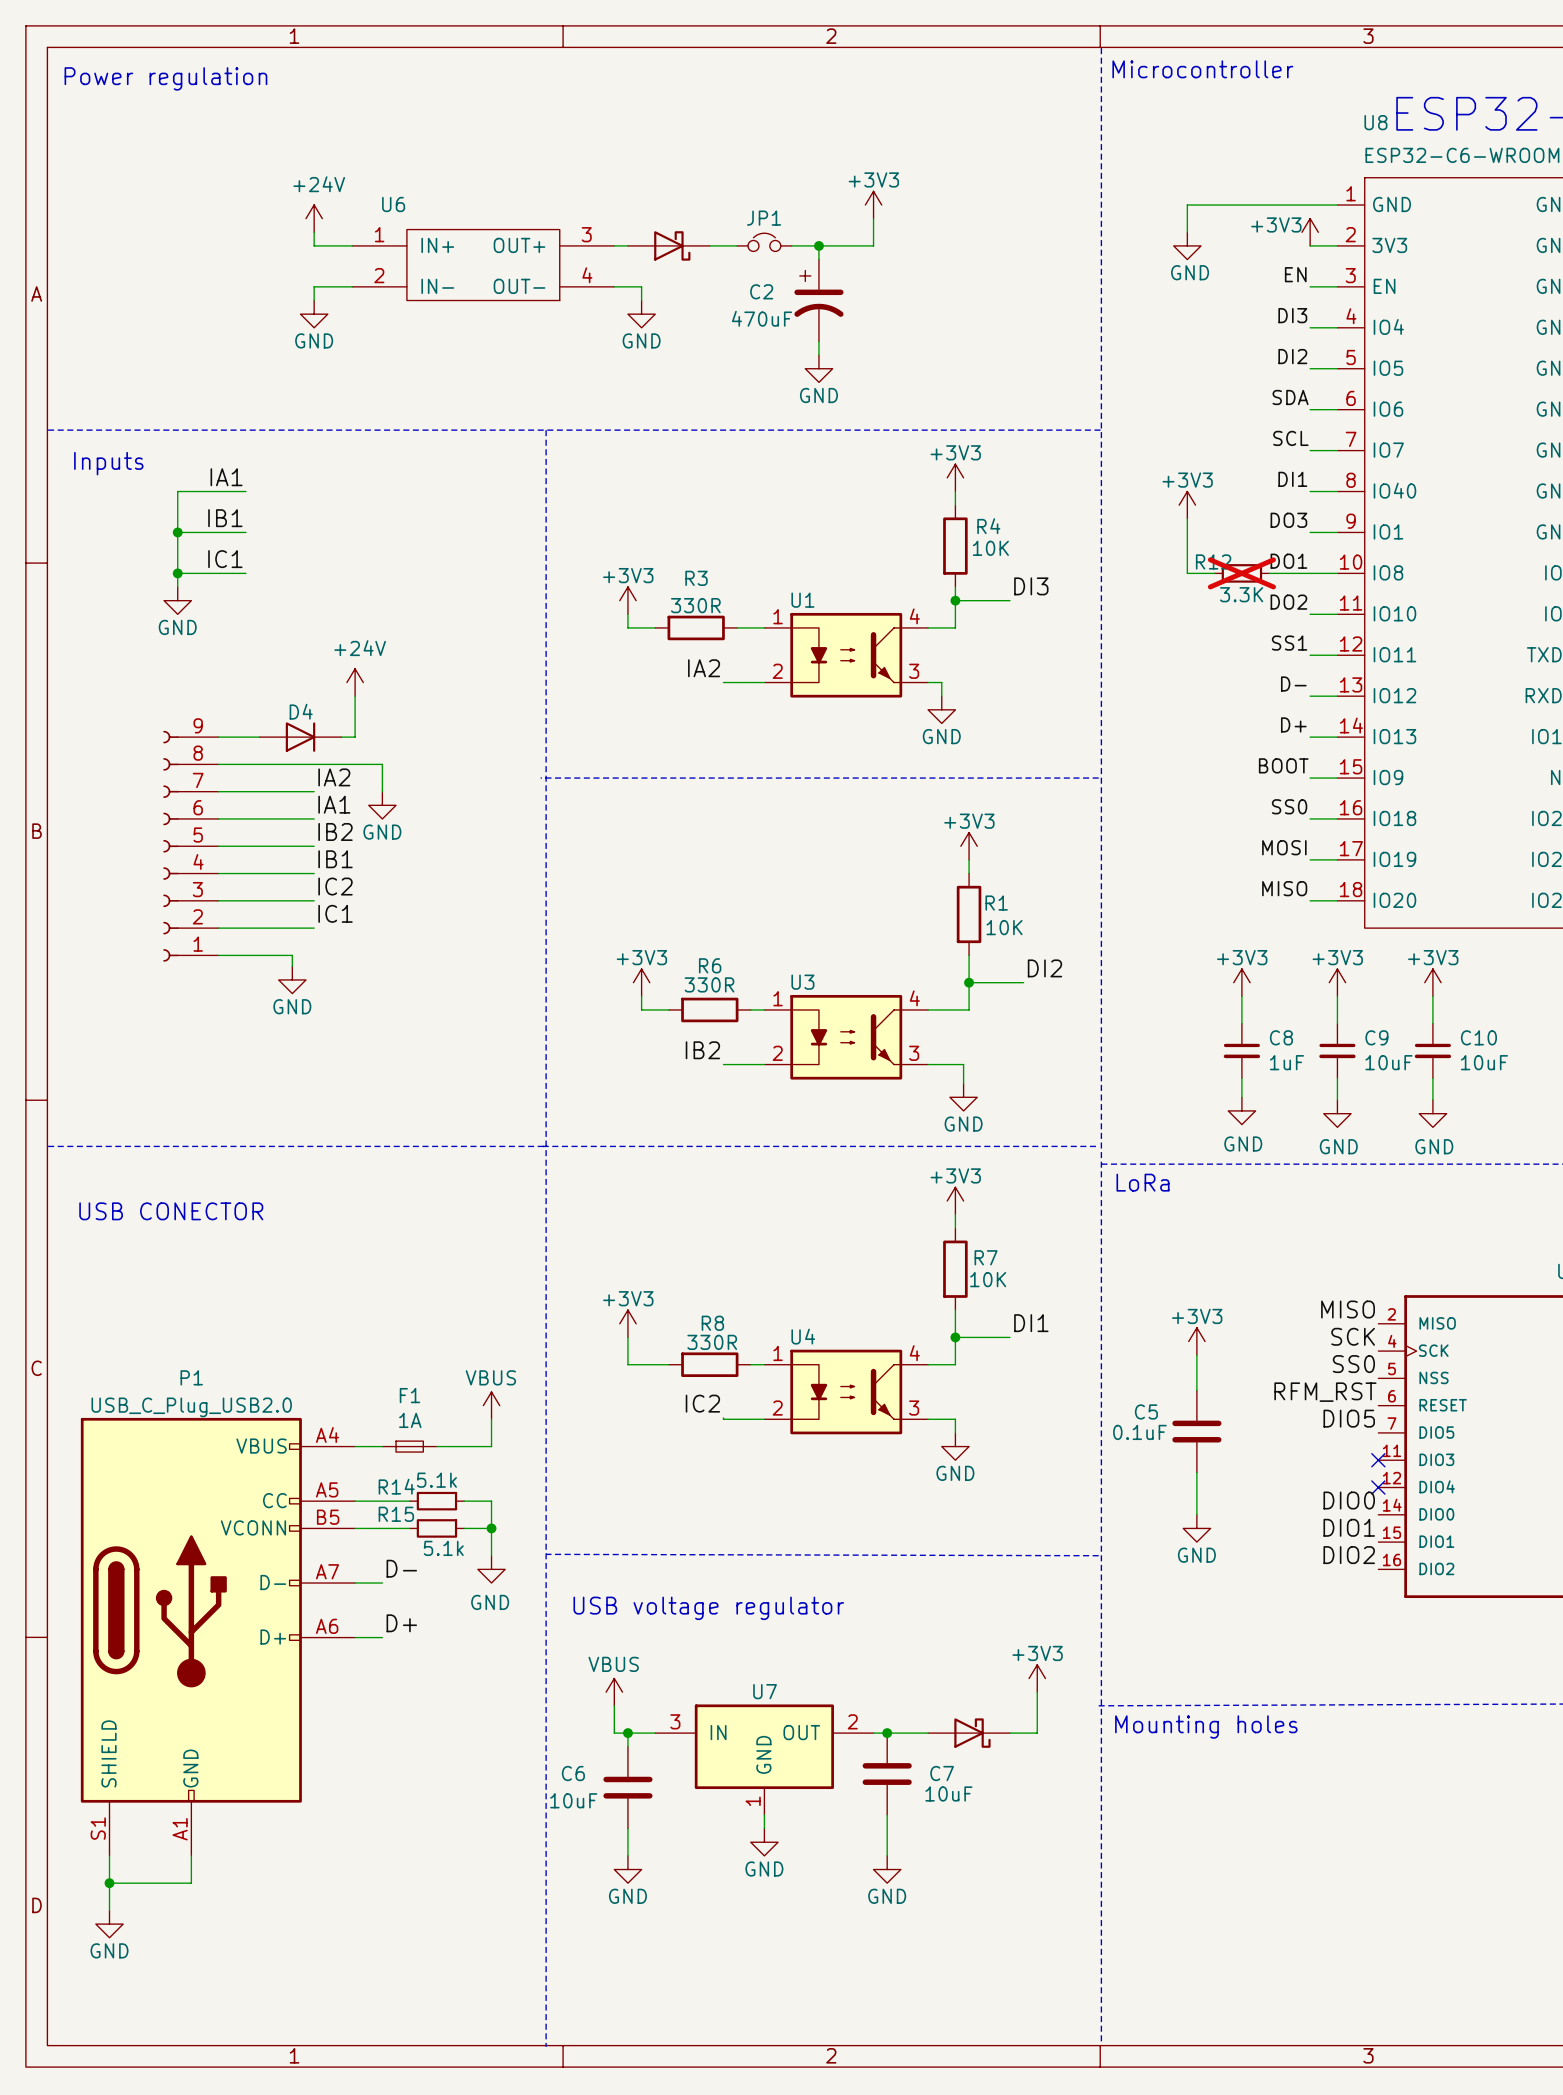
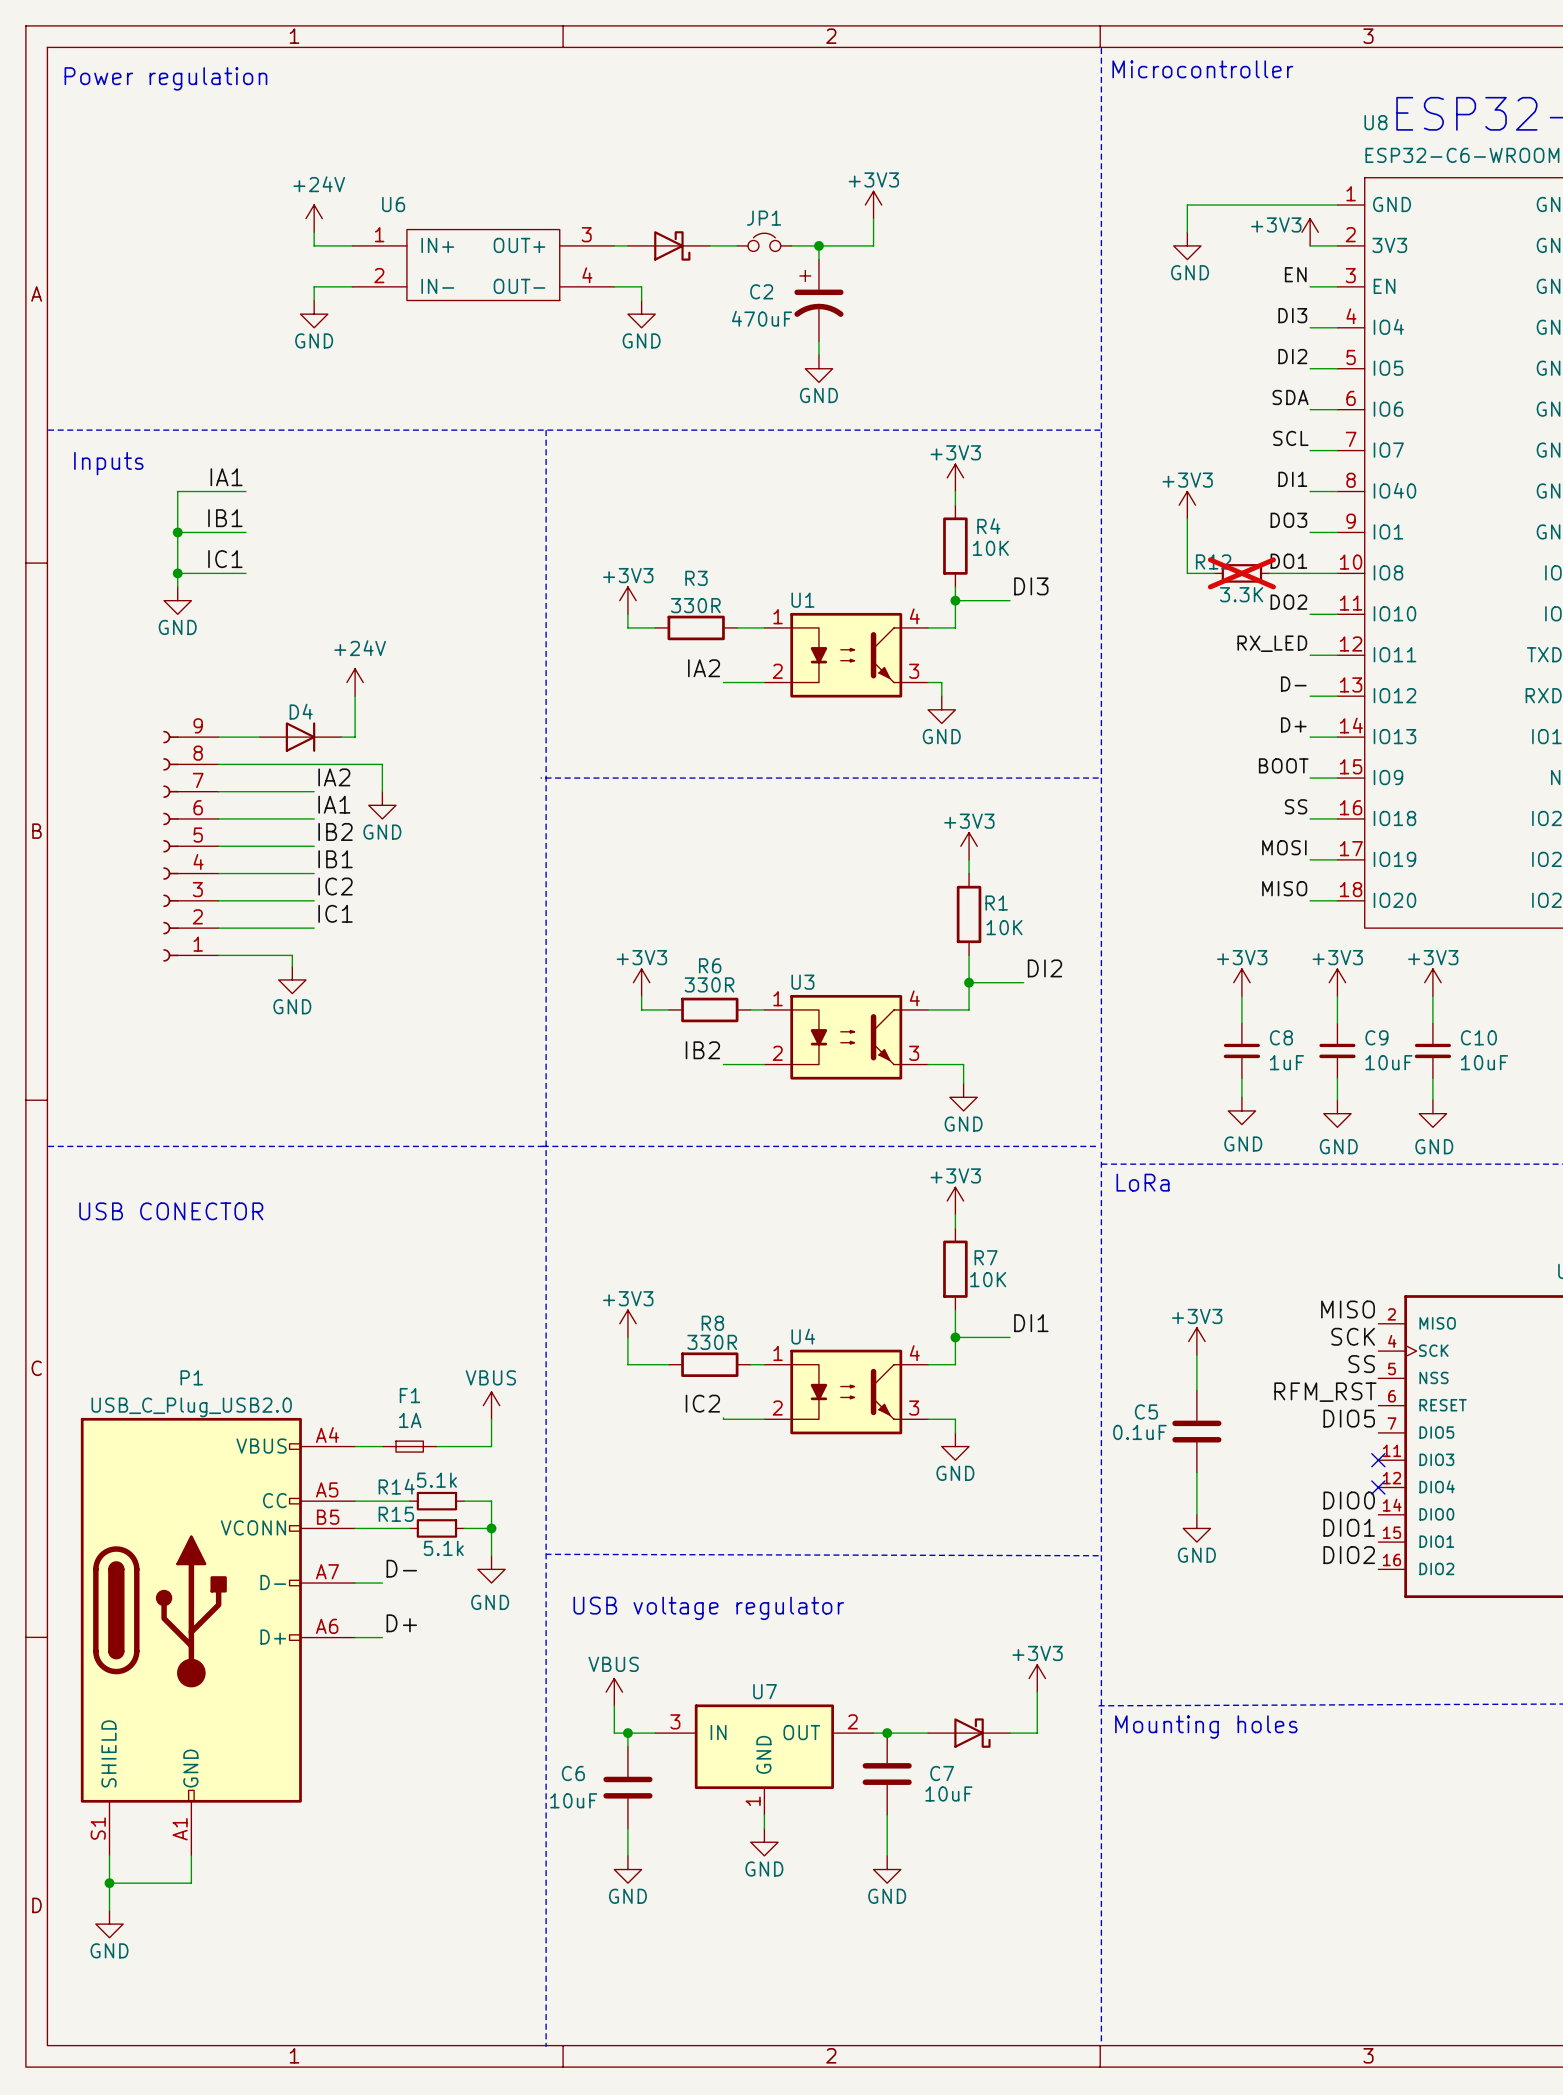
label: SS1 (1289, 643) -> RX_LED (1272, 643)
label: SS0 (1289, 806) -> SS (1296, 806)
label: SS0 (1353, 1364) -> SS (1361, 1364)

